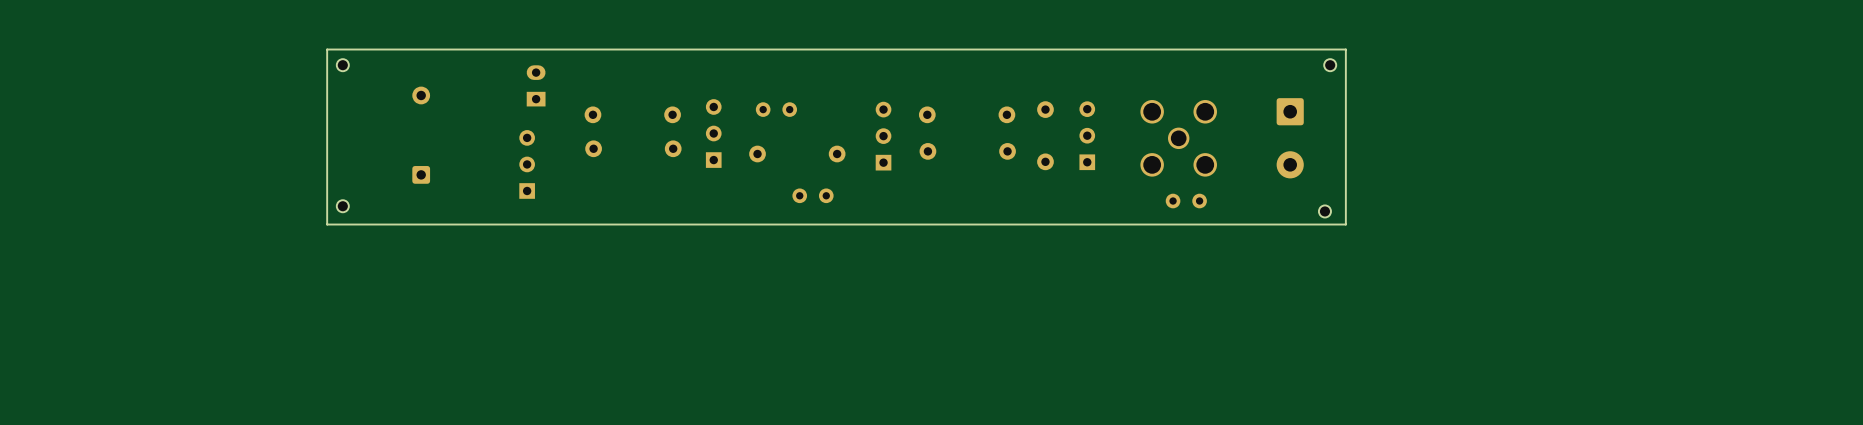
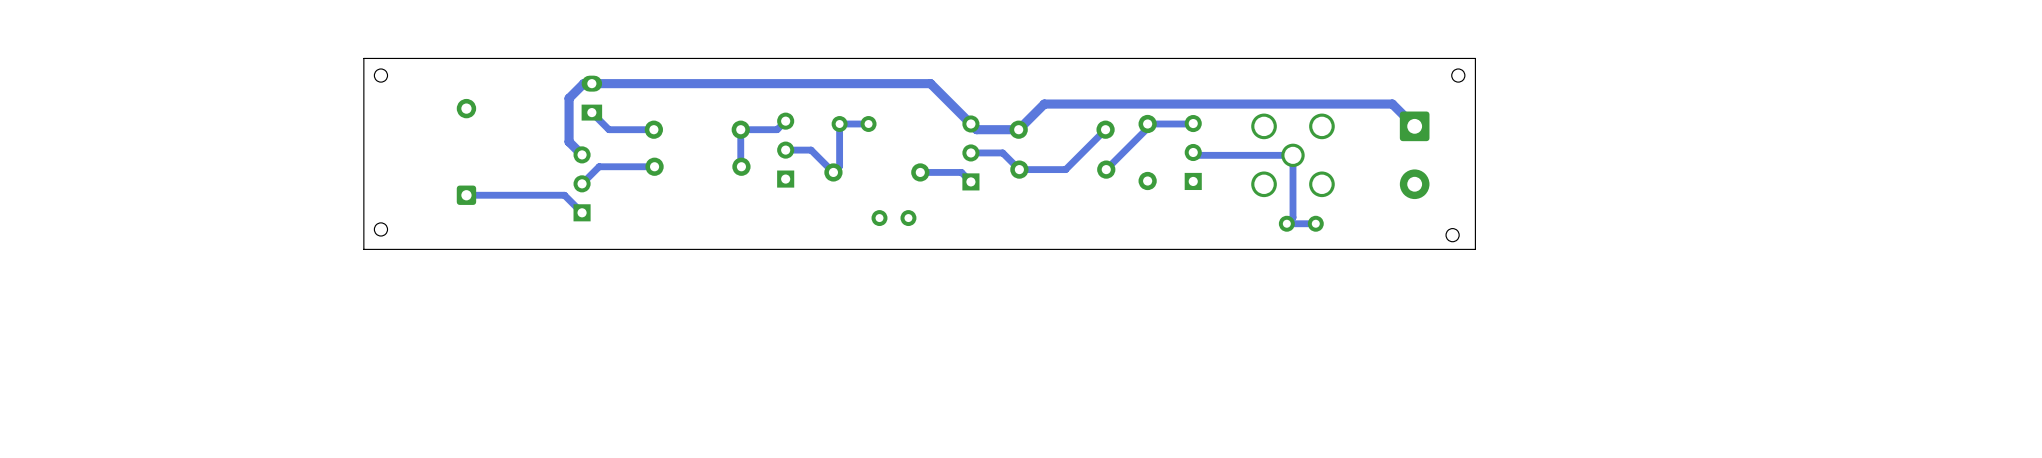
track: none -> (591, 112) (608, 129) (653, 129)
track: none -> (785, 121) (777, 129) (740, 129) (741, 166)
track: none -> (868, 123) (839, 123) (839, 166) (833, 172) (811, 150) (785, 150)
track: none -> (1193, 123) (1147, 123) (1147, 128) (1106, 169)
track: none -> (1414, 126) (1392, 104) (1044, 104) (1018, 129) (976, 129) (930, 83) (583, 83) (569, 98) (569, 141) (582, 154)
track: none -> (1105, 129) (1065, 169) (1019, 169) (1002, 152) (970, 152)
track: none -> (1193, 152) (1196, 155) (1292, 155) (1292, 217) (1286, 223) (1315, 223)
track: none -> (654, 166) (599, 166) (582, 183)
track: none -> (920, 172) (961, 172) (970, 181)
track: none -> (466, 195) (564, 195) (582, 212)

